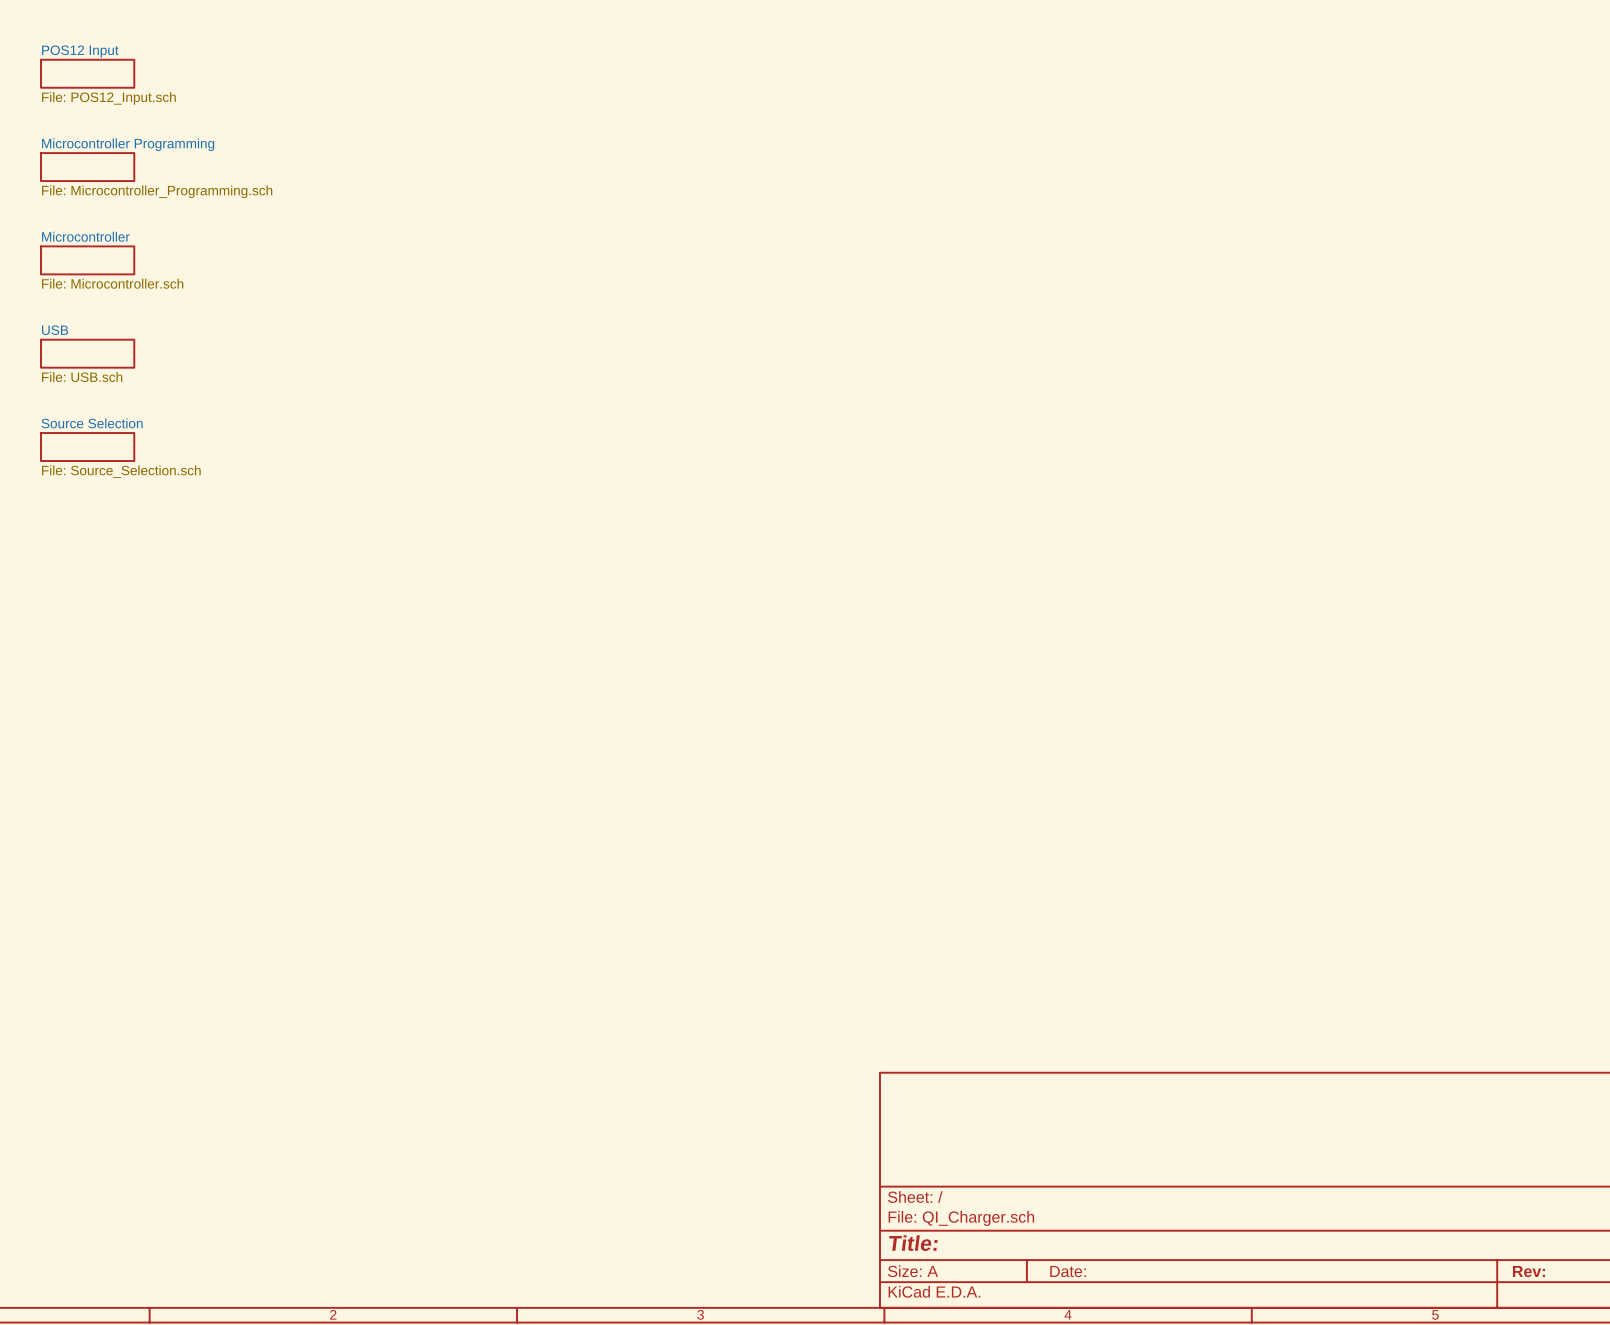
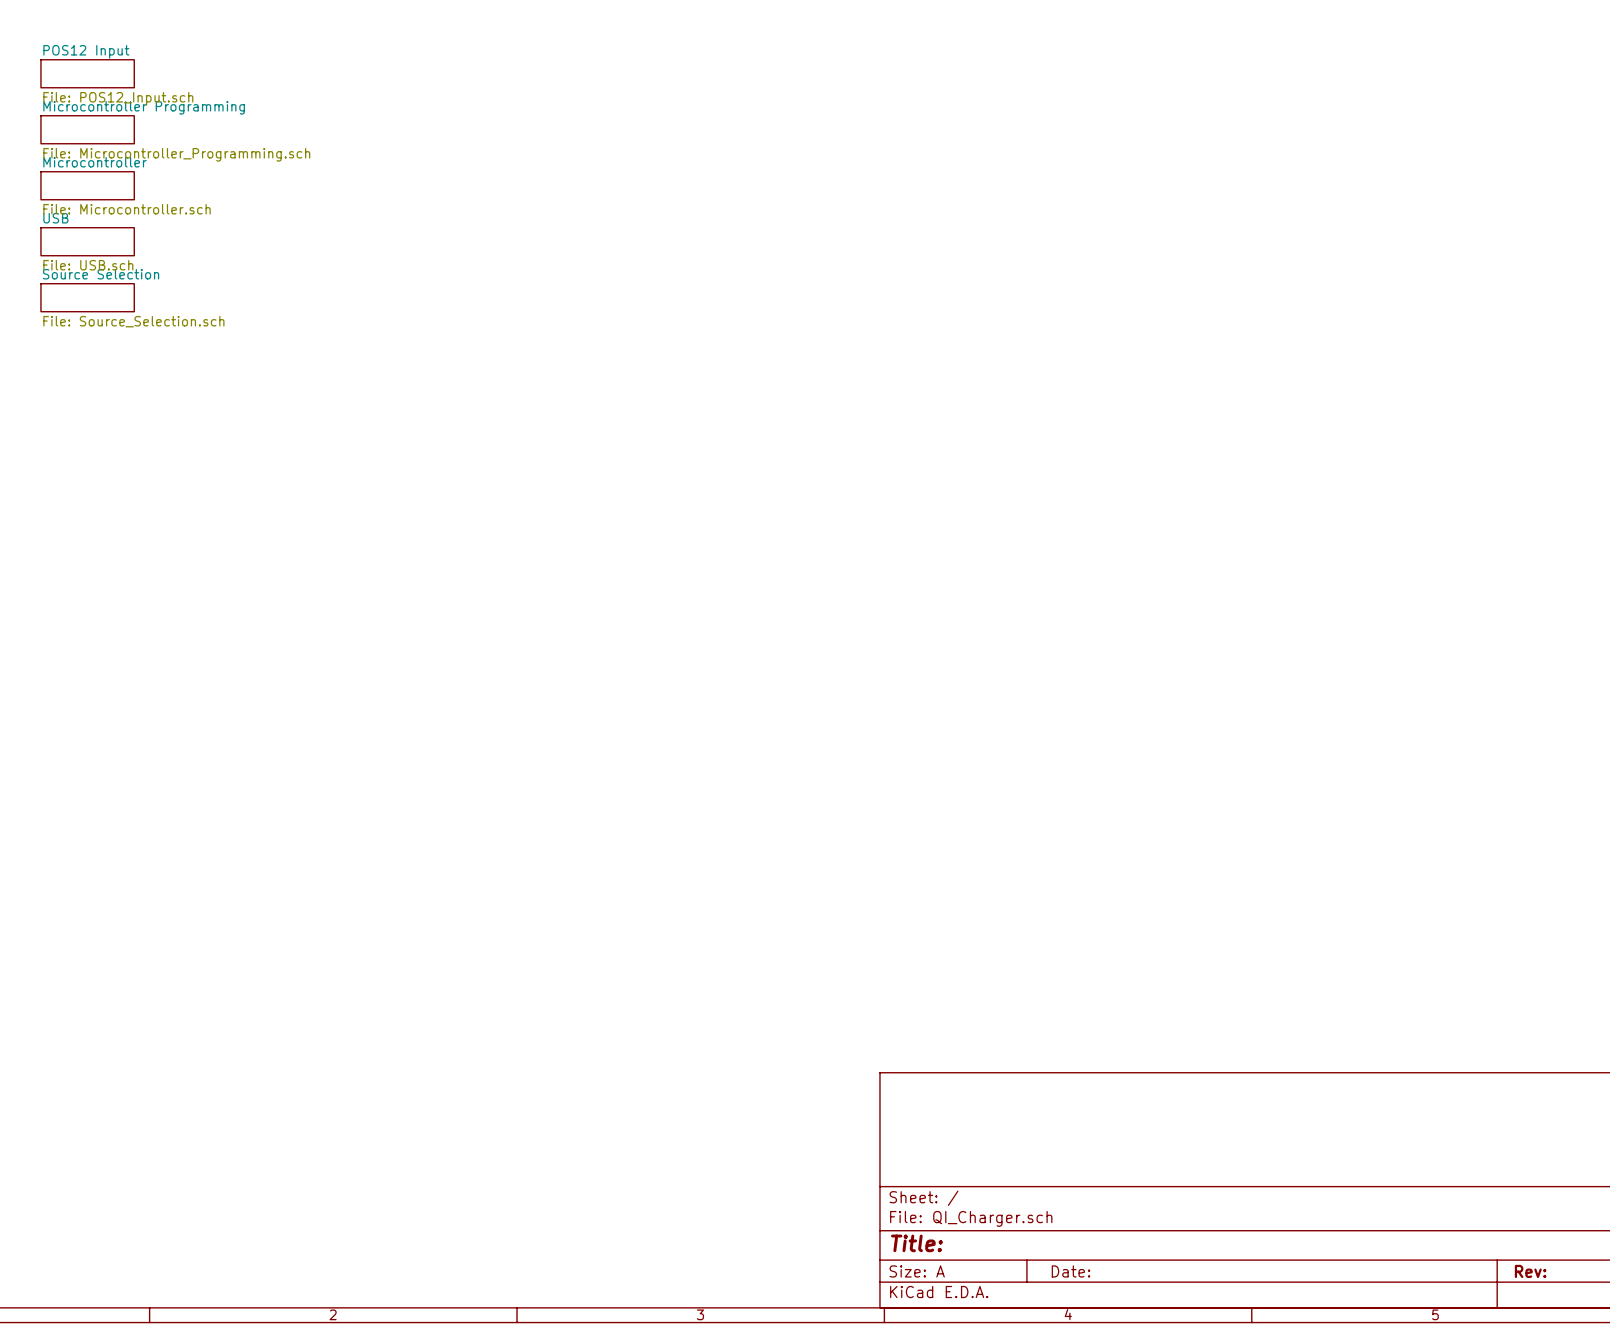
sheet Microcontroller Programming position: (87, 167) -> (87, 129)
sheet Microcontroller position: (87, 260) -> (87, 185)
sheet USB position: (87, 353) -> (87, 241)
sheet Source Selection position: (87, 447) -> (87, 297)

